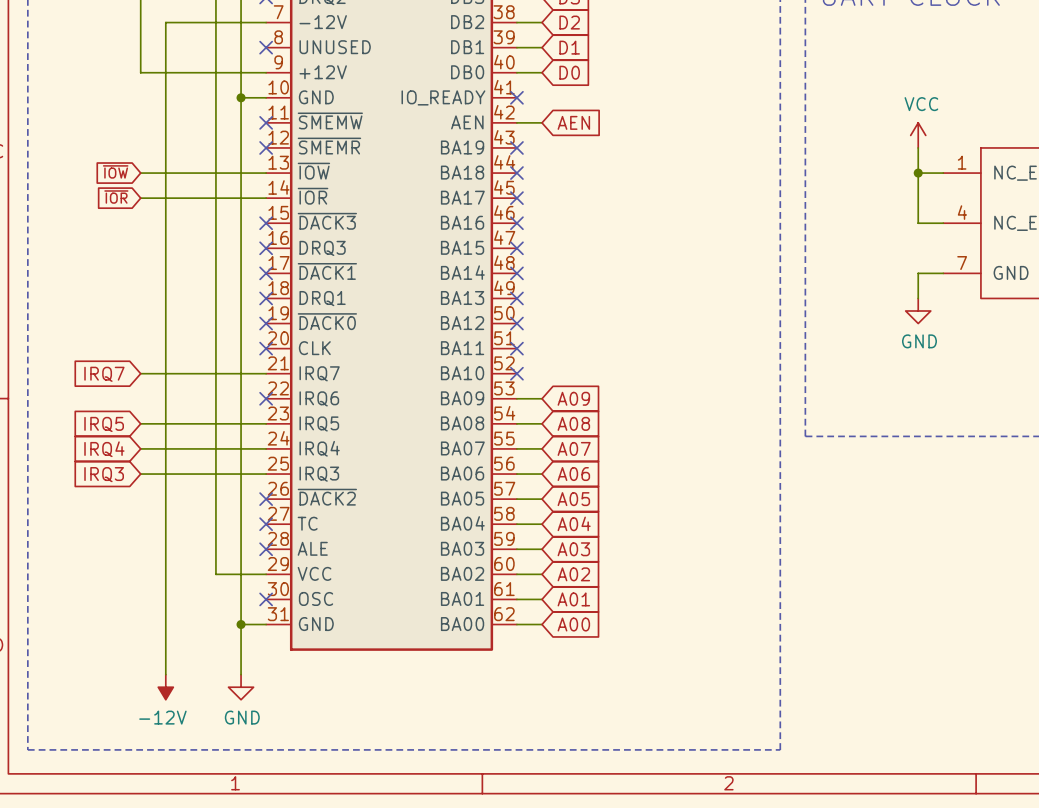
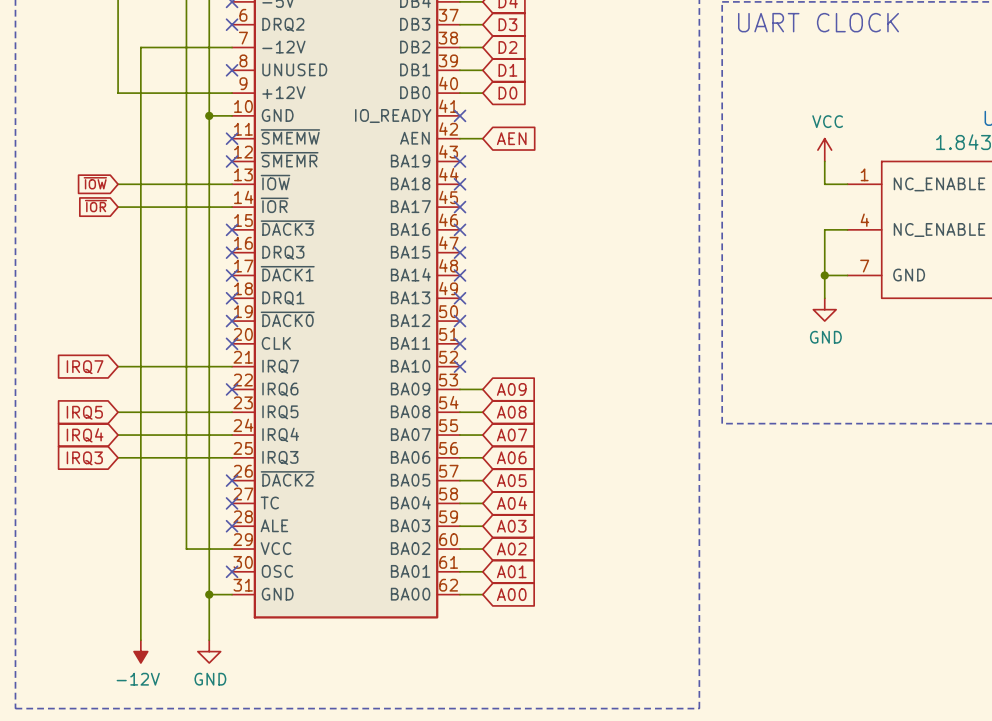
wire: (918, 173) (918, 223) -> (824, 275) (824, 229)
junction: (918, 173) -> none
junction: none -> (824, 275)

